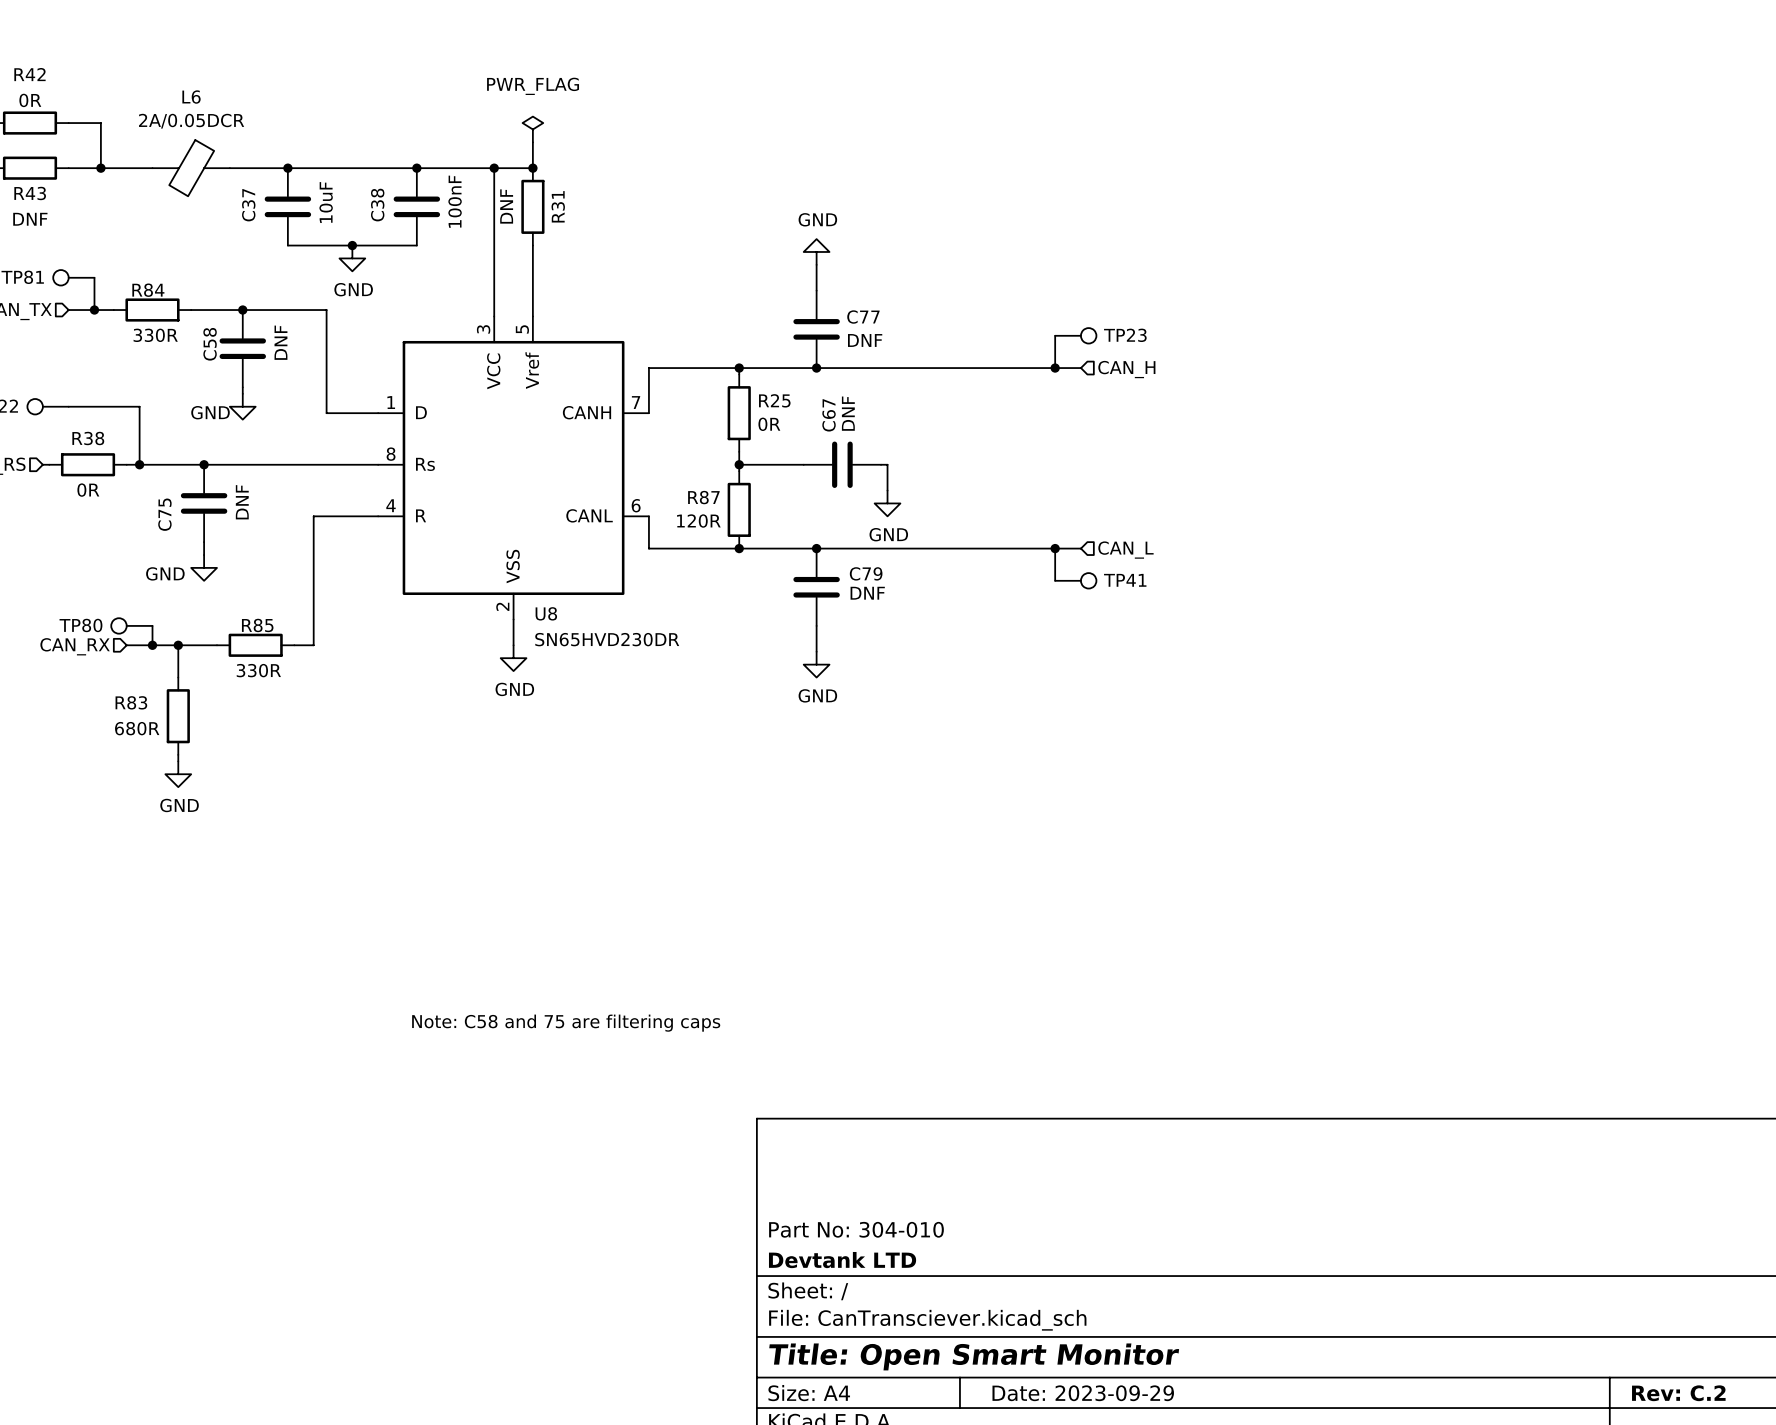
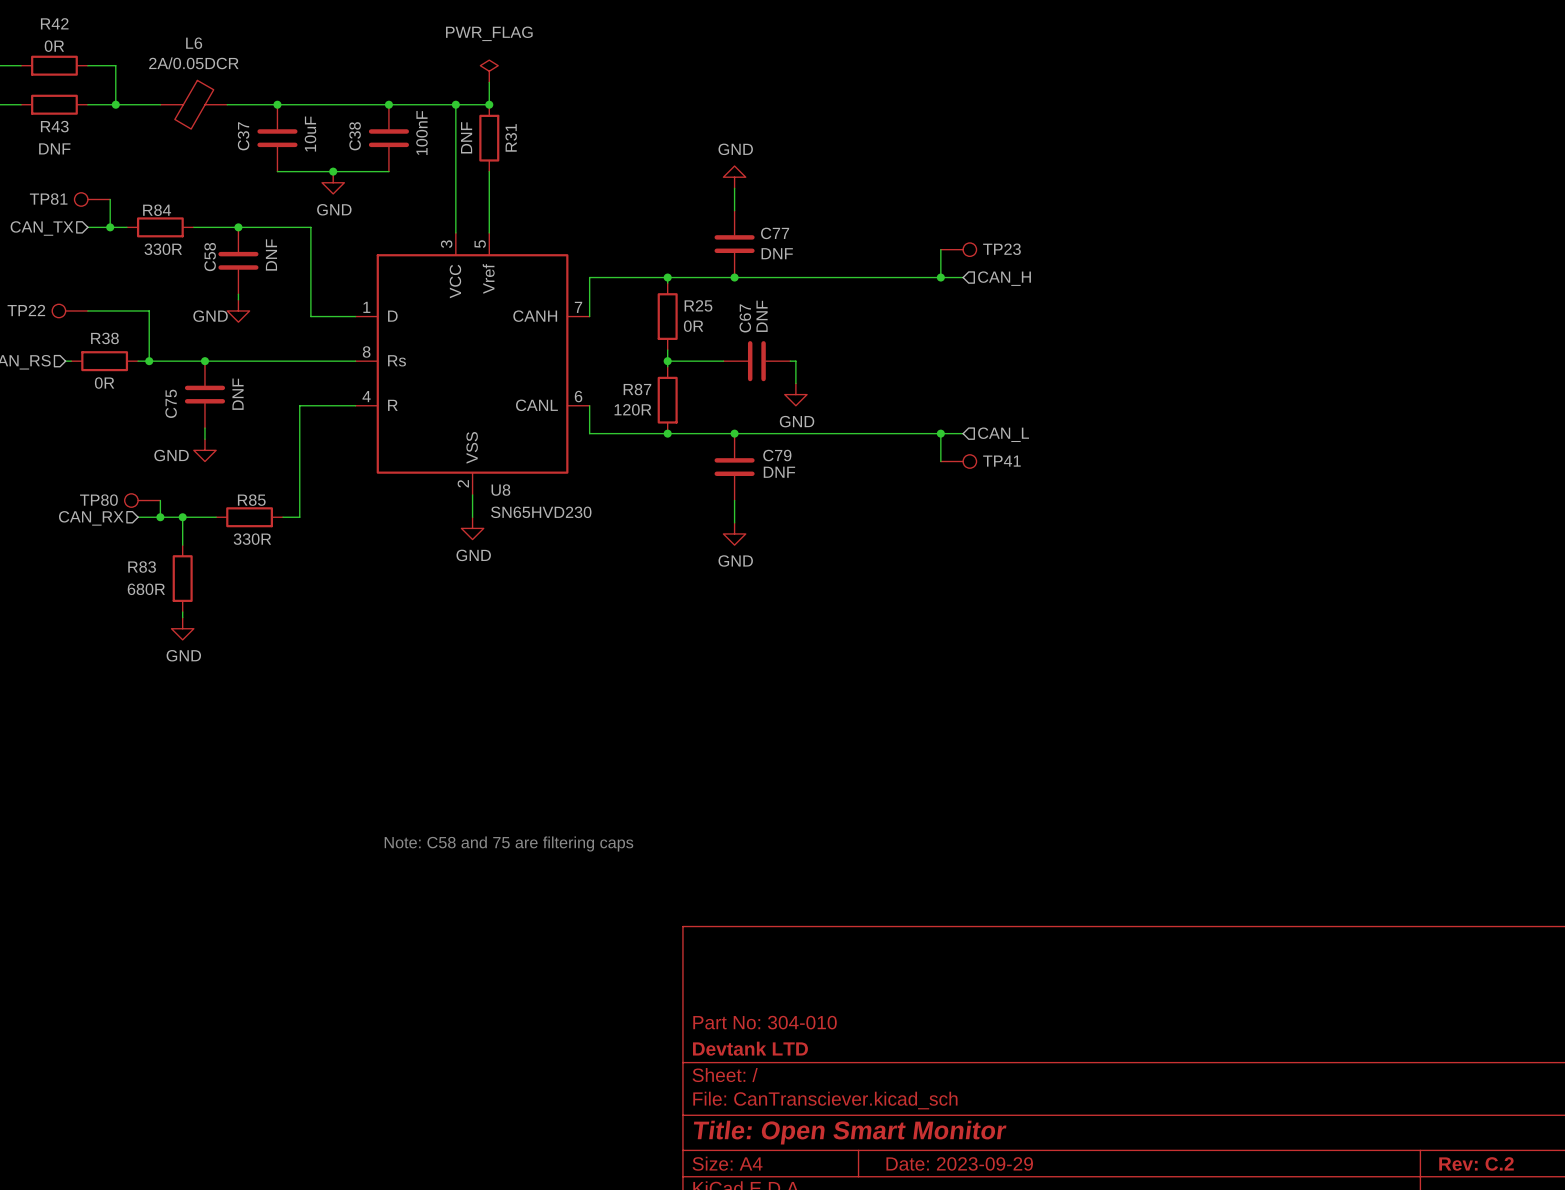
U8 value: SN65HVD230DR (607, 639) -> SN65HVD230 (541, 512)

